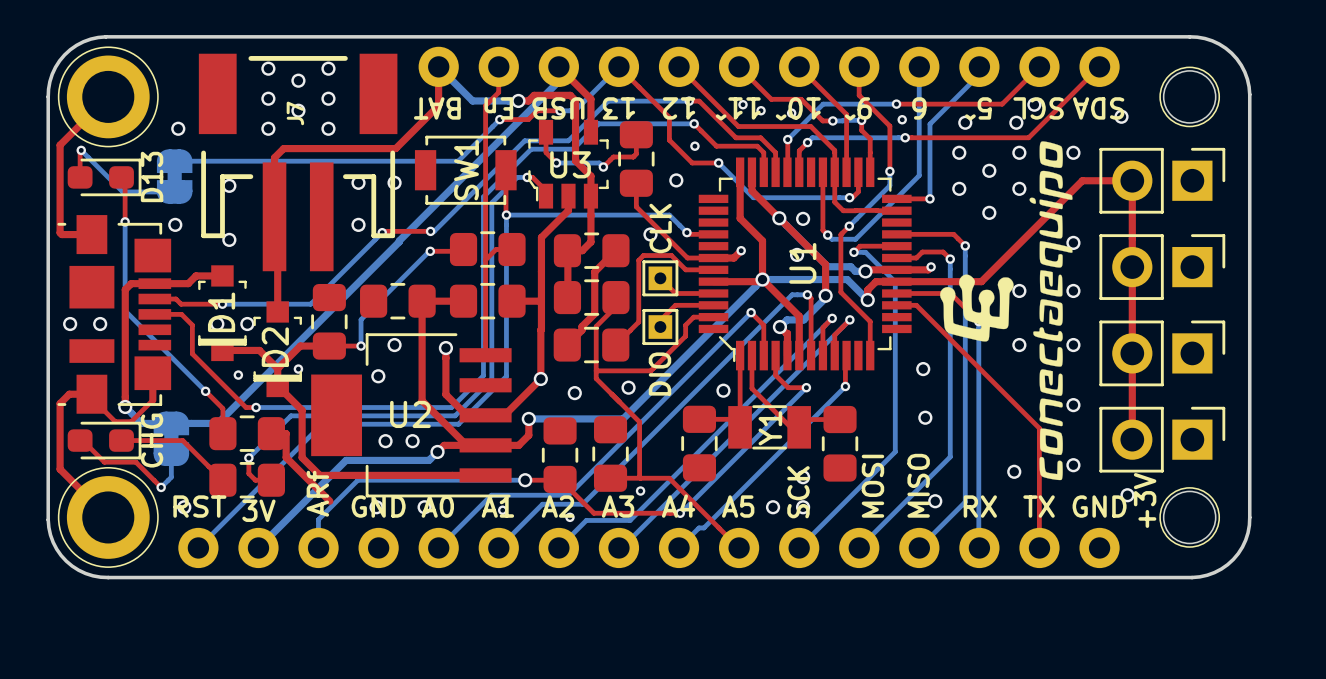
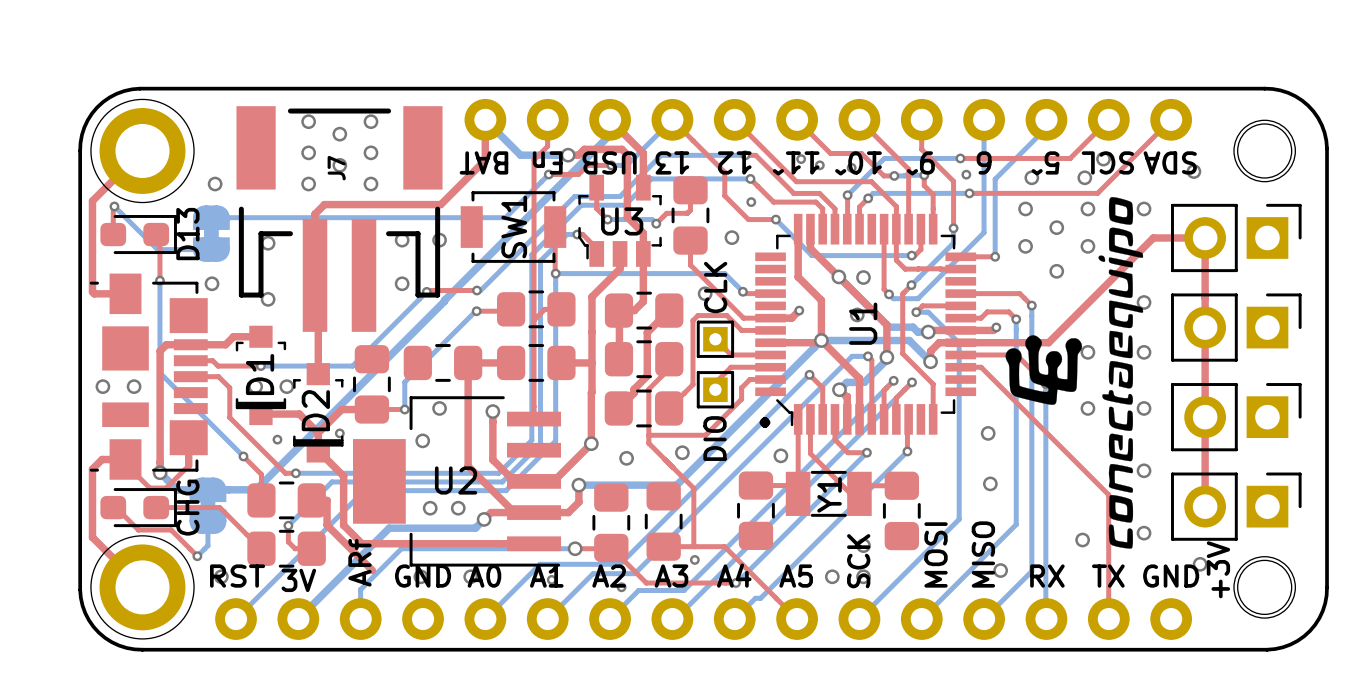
text: none -> . (764, 422)

